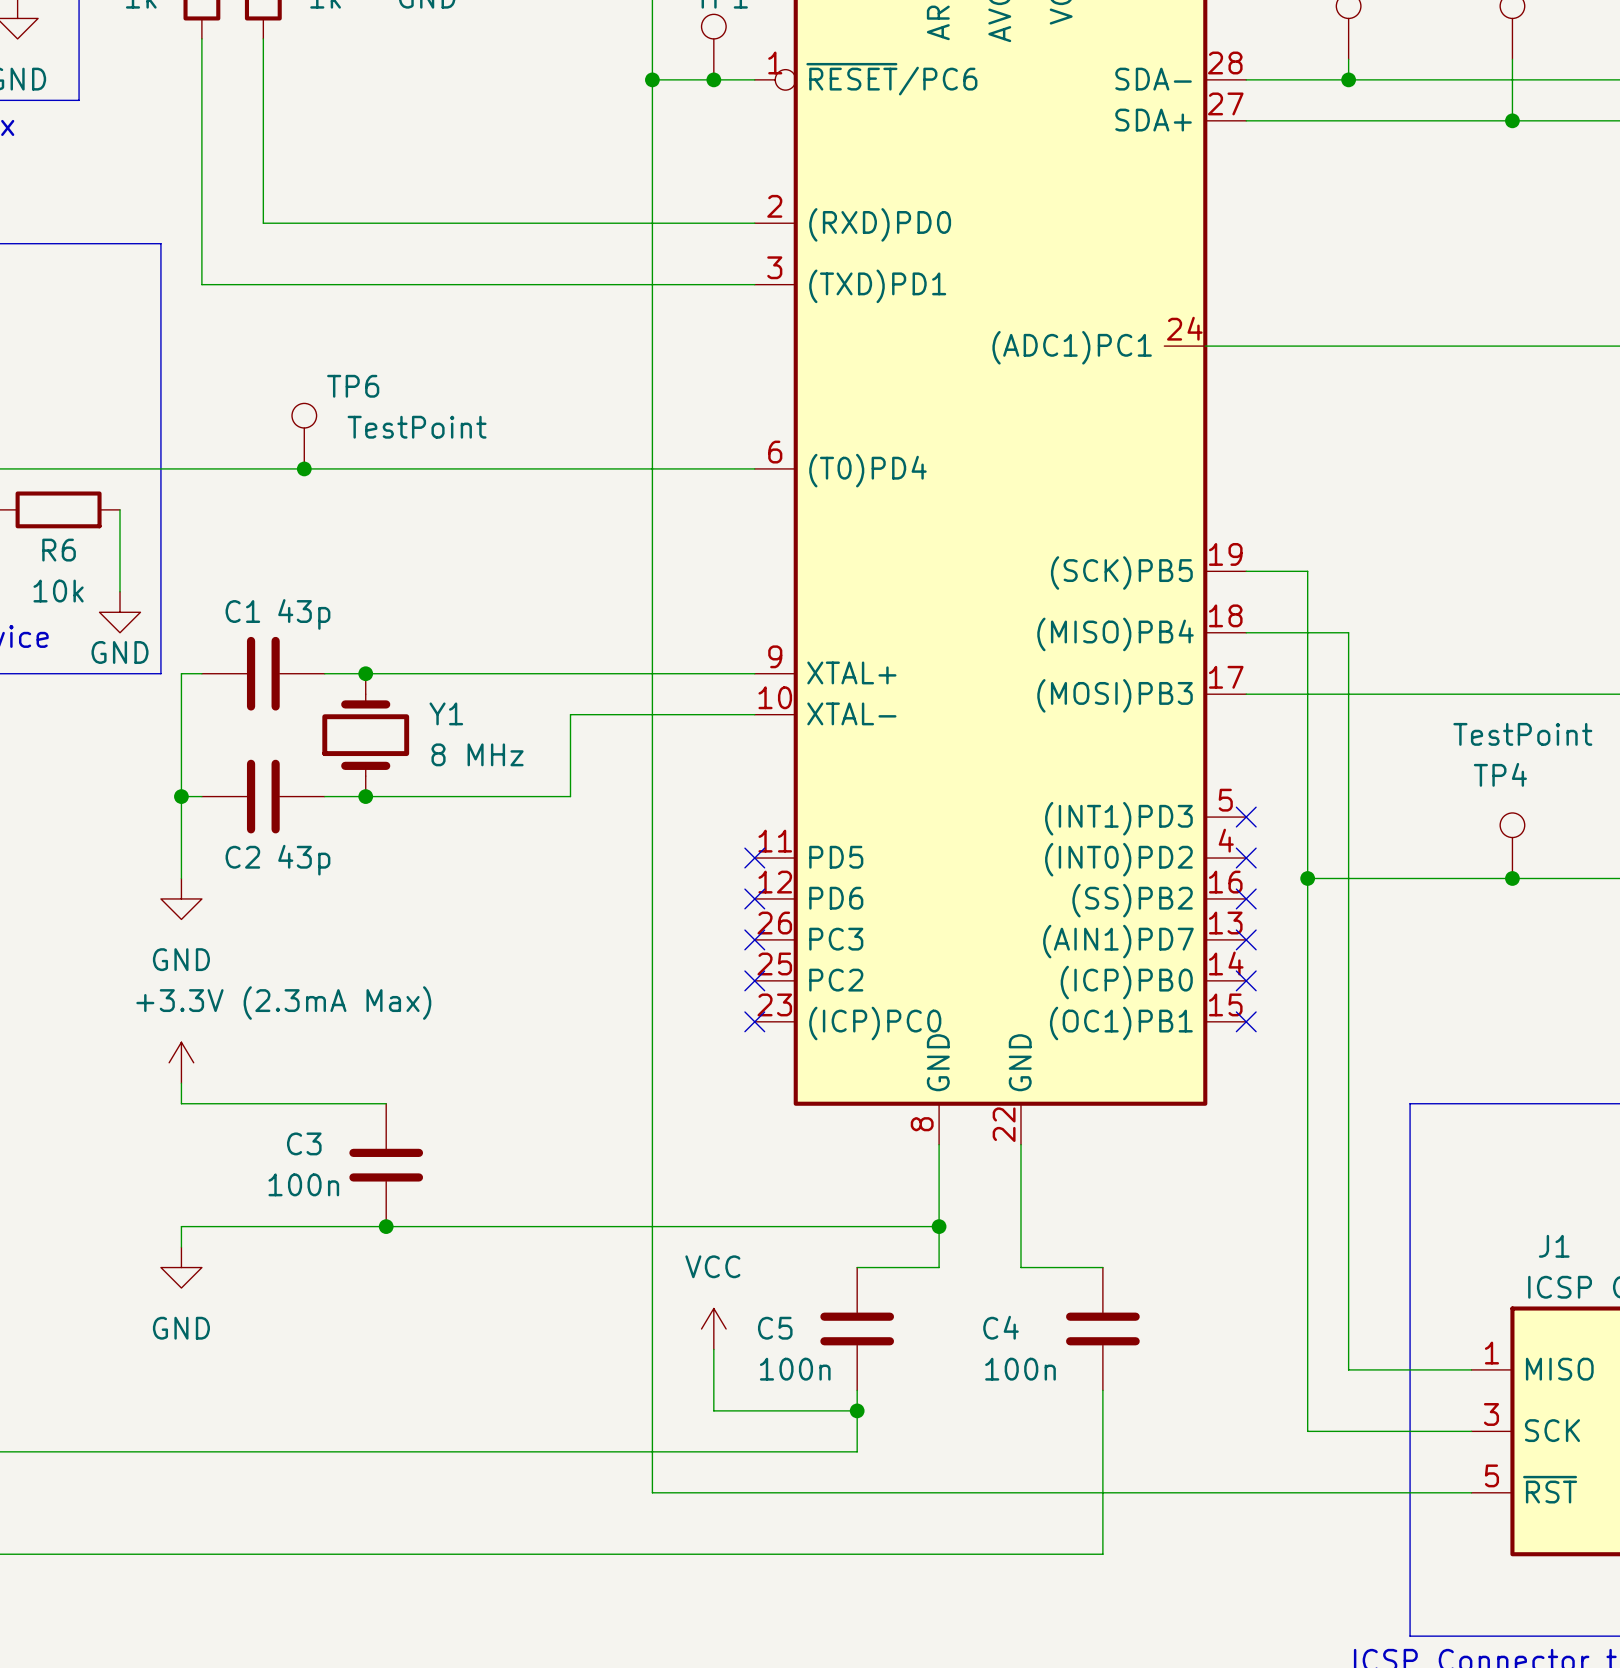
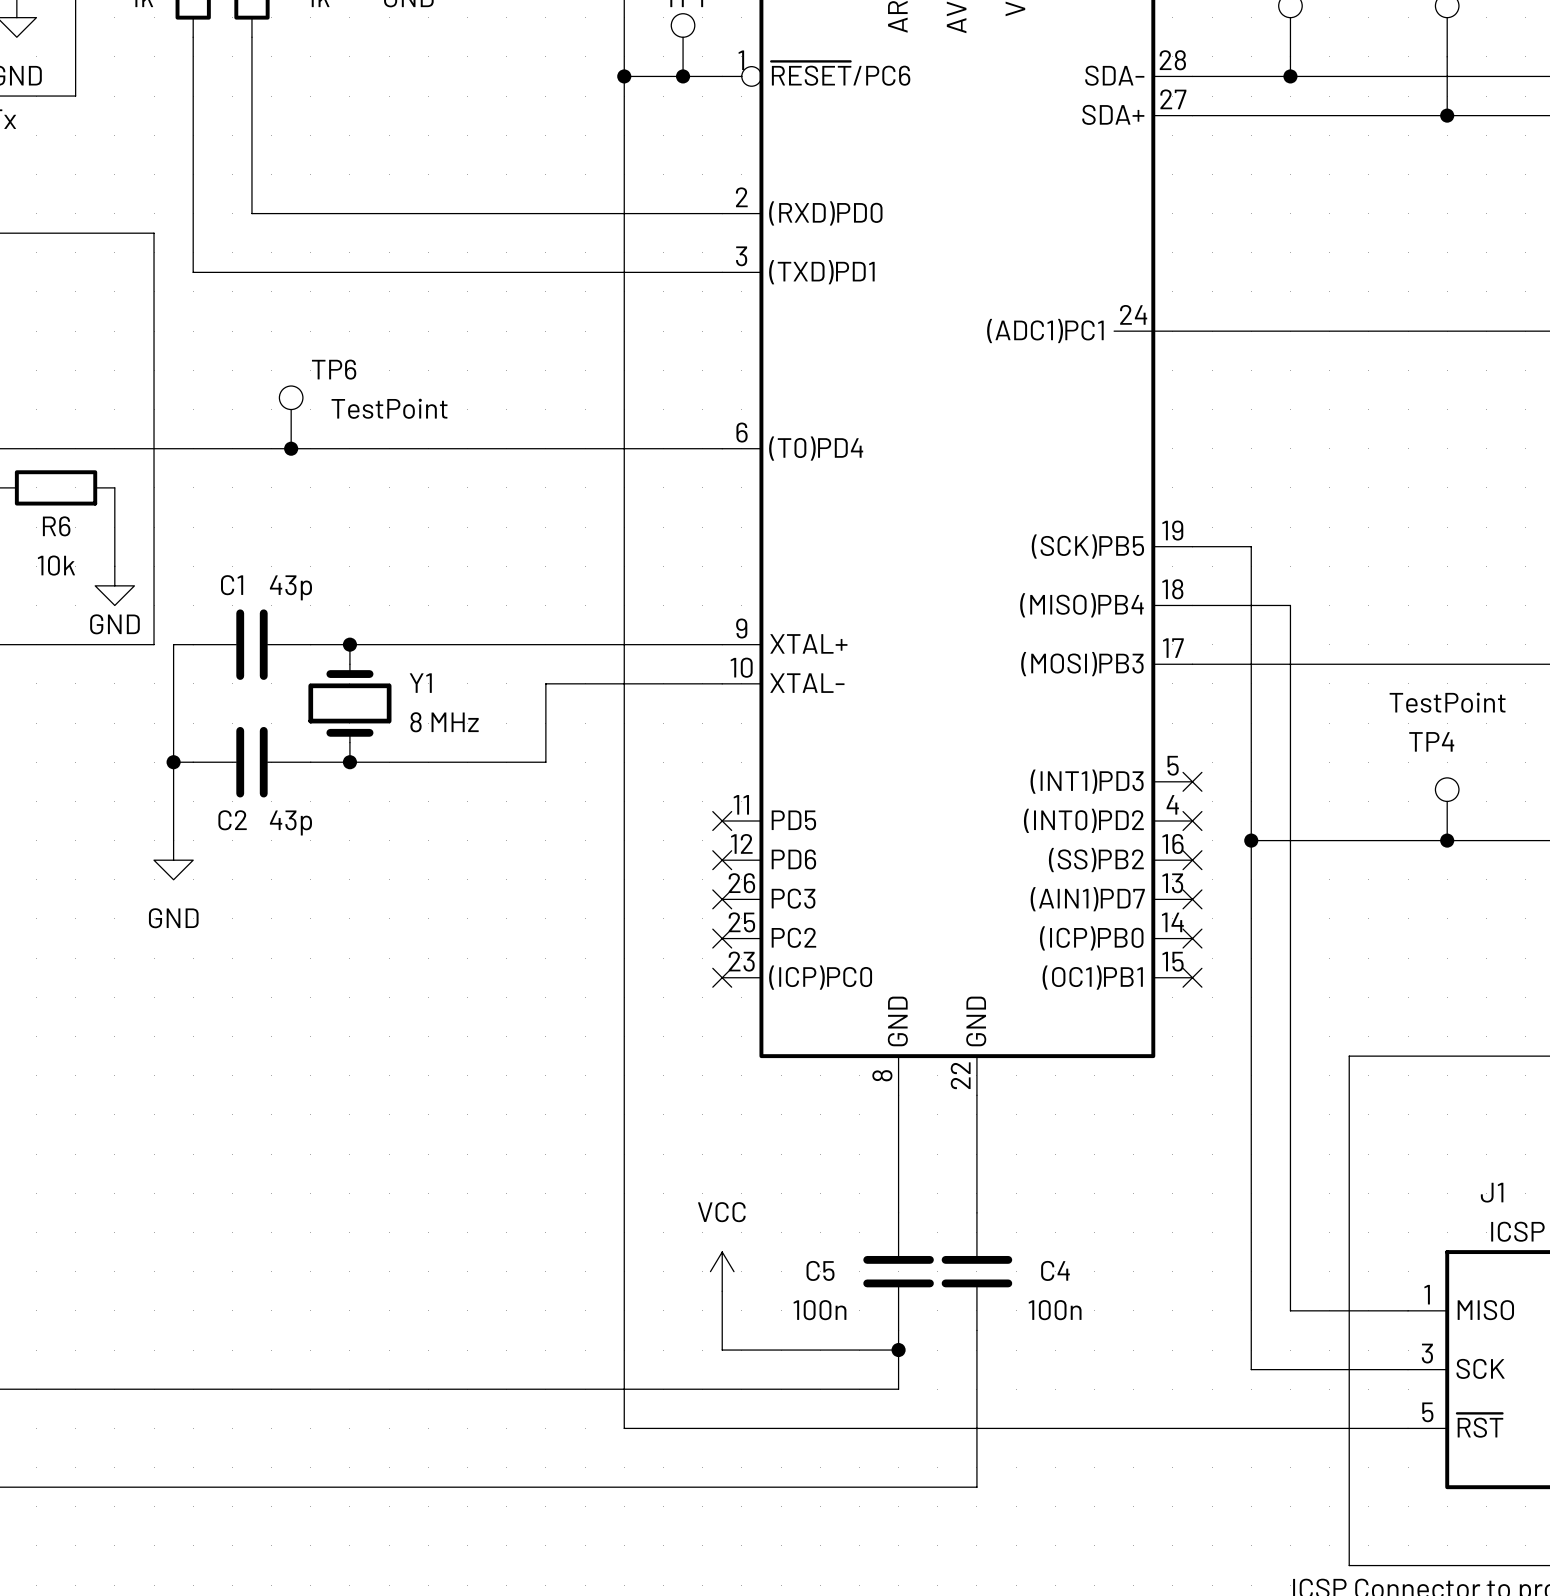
power symbol: +3.3V (2.3mA Max) (181, 1062) -> none
wire: (181, 1083) (181, 1103) (386, 1103) -> none
C3: 100n (386, 1165) -> none
junction: (386, 1226) -> none
wire: (939, 1226) (181, 1226) (181, 1247) -> none
junction: (939, 1226) -> none
power symbol: GND (181, 1267) -> none
wire: (857, 1267) (939, 1267) -> (820, 1350) (898, 1350)
wire: (1020, 1267) (1102, 1267) -> none
C4 name position: C4 (1001, 1327) -> C4 (1055, 1270)
power symbol position: VCC (713, 1328) -> VCC (722, 1271)
C5 position: (857, 1328) -> (898, 1271)
C4 position: (1102, 1328) -> (976, 1271)
wire: (713, 1349) (713, 1410) (754, 1410) -> (722, 1291) (722, 1350)
C4 value position: 100n (795, 1369) -> 100n (1055, 1310)
C5 value position: 100n (1020, 1369) -> 100n (819, 1310)
wire: (857, 1390) (857, 1451) -> (898, 1330) (898, 1389) (820, 1389)
wire: (1102, 1390) (1102, 1554) (1020, 1554) -> (976, 1330) (976, 1487)
junction position: (857, 1410) -> (898, 1350)

